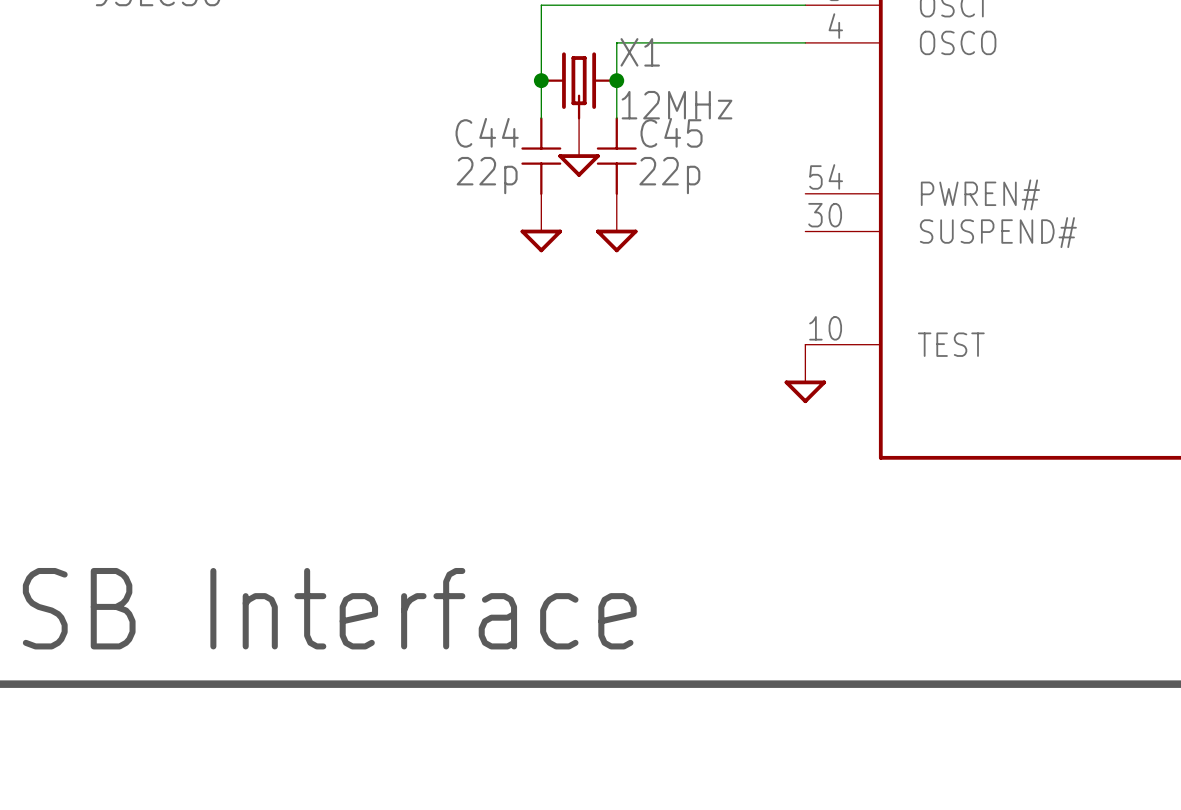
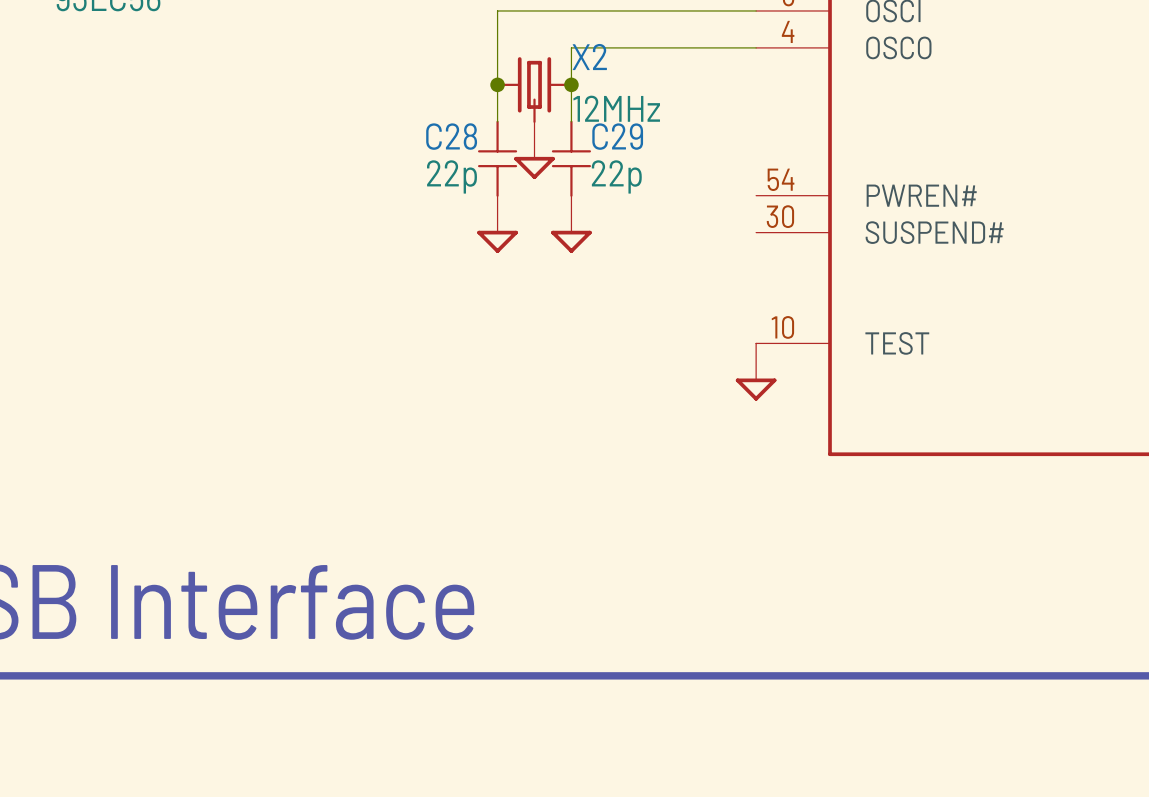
X1 name: X1 (640, 52) -> X2 (589, 57)
C44 name: C44 (487, 132) -> C28 (451, 136)
C45 name: C45 (671, 132) -> C29 (617, 136)

